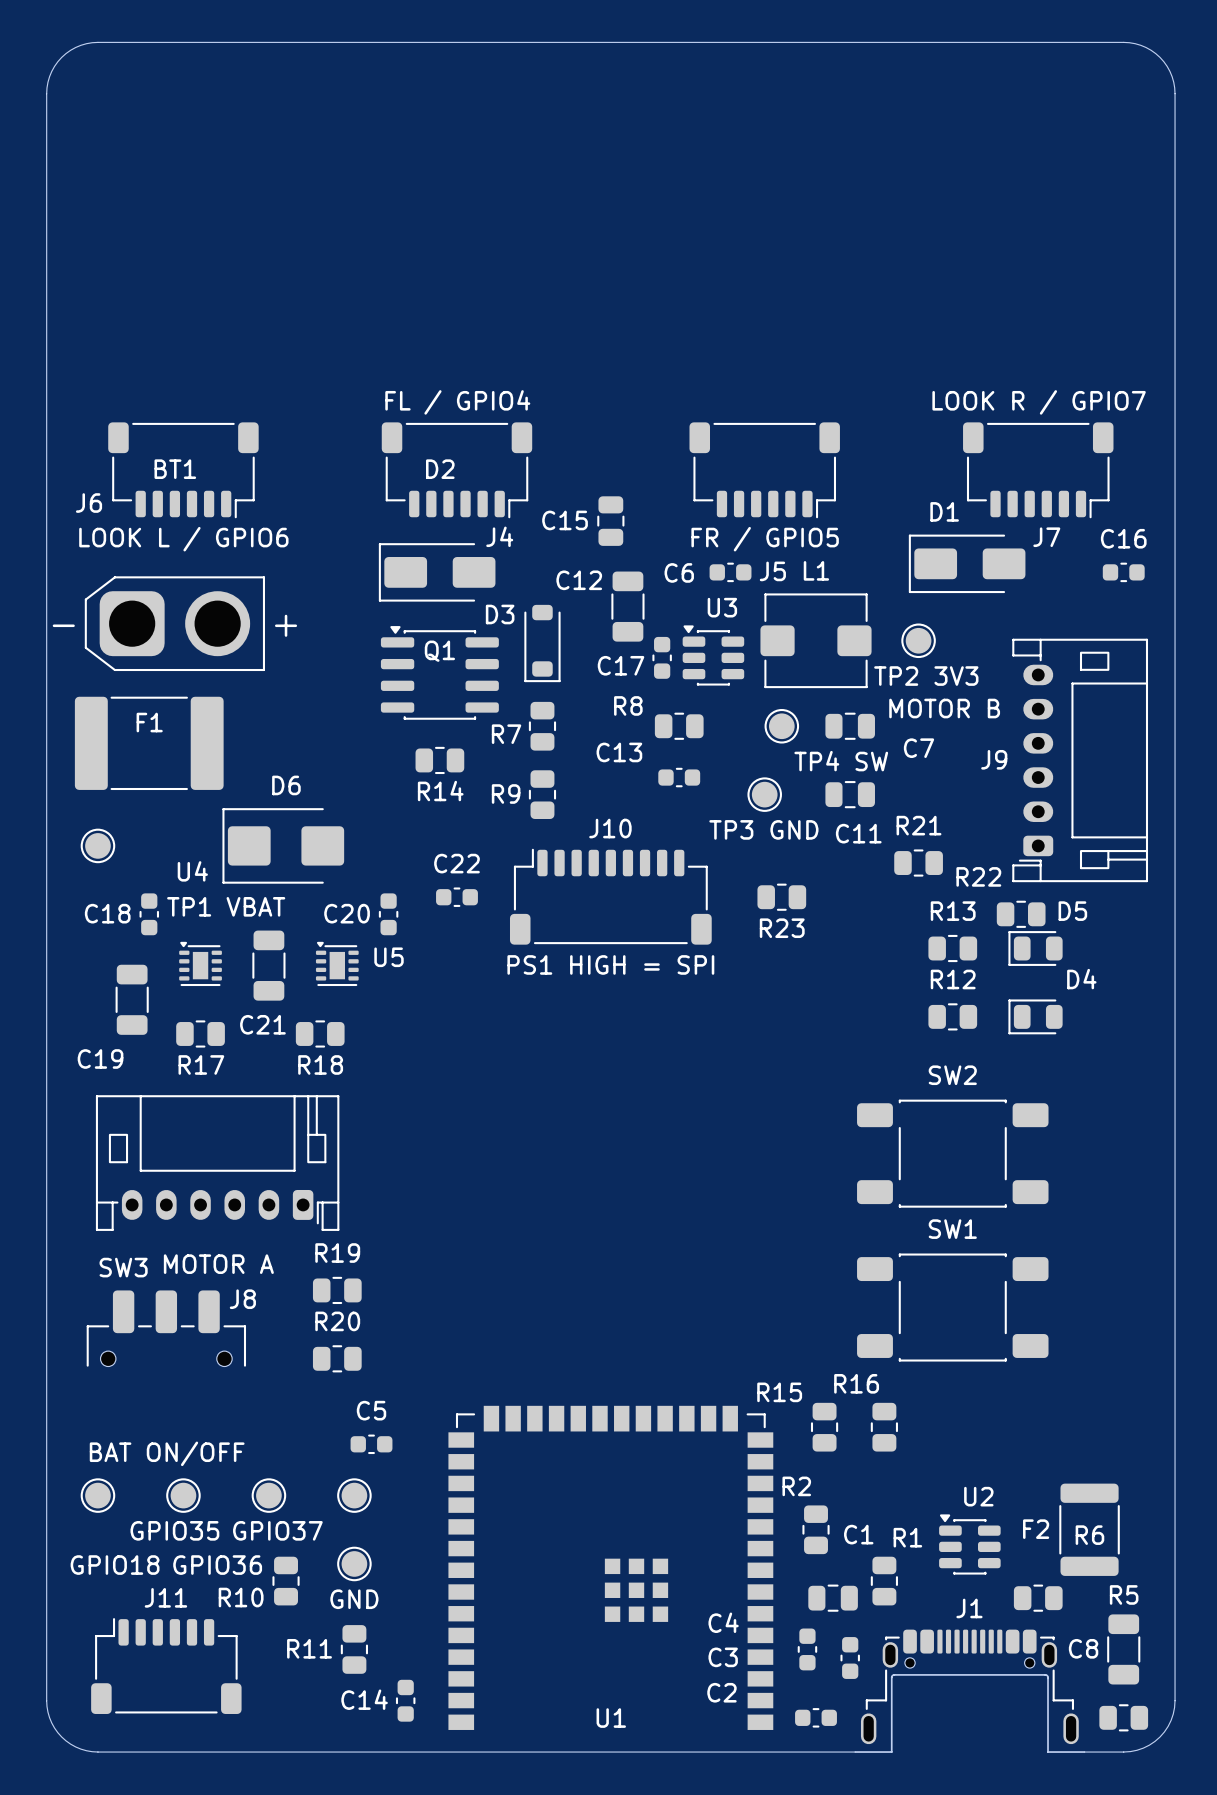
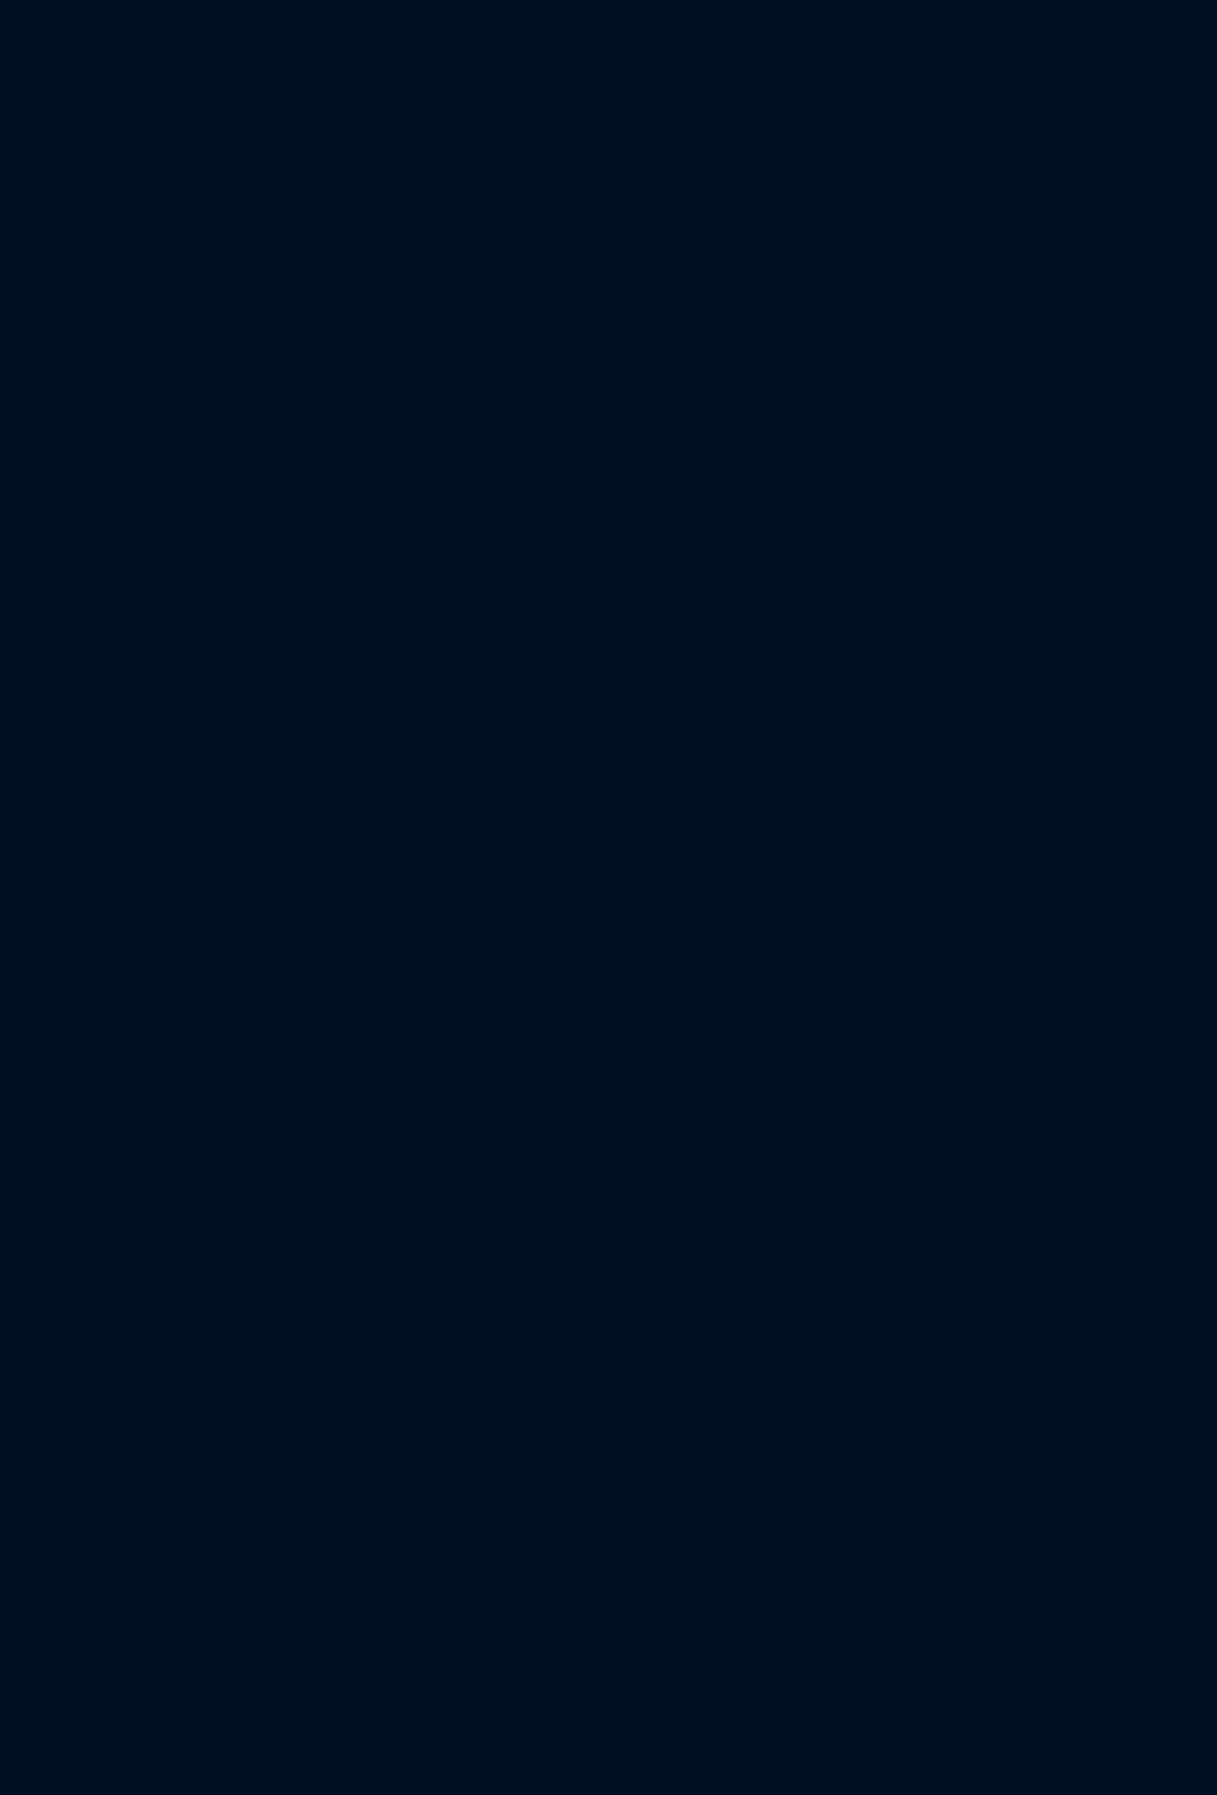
text: FL / GPIO4 (457, 402) -> none
text: LOOK R / GPIO7 (1039, 402) -> none
J6: (183, 470) -> none
J4: (456, 470) -> none
J5: (764, 470) -> none
J7: (1038, 470) -> none
C15: (610, 521) -> none
text: LOOK L / GPIO6 (183, 539) -> none
text: FR / GPIO5 (765, 539) -> none
D1: (967, 563) -> none
D2: (437, 572) -> none
C6: (730, 572) -> none
C16: (1123, 572) -> none
C12: (627, 606) -> none
BT1: (174, 623) -> none
L1: (816, 640) -> none
part: (918, 640) -> none
D3: (542, 643) -> none
U3: (713, 655) -> none
C17: (662, 657) -> none
Q1: (439, 672) -> none
text: TP2 3V3 (926, 676) -> none
text: MOTOR B (944, 708) -> none
R7: (542, 726) -> none
R8: (679, 726) -> none
part: (781, 726) -> none
C7: (850, 726) -> none
F1: (149, 743) -> none
R14: (439, 760) -> none
J9: (1080, 760) -> none
text: TP4 SW (841, 761) -> none
C13: (679, 777) -> none
R9: (542, 794) -> none
part: (764, 794) -> none
C11: (850, 794) -> none
text: TP3 GND (763, 829) -> none
part: (97, 845) -> none
D6: (283, 845) -> none
R21: (918, 863) -> none
J10: (610, 896) -> none
C22: (456, 897) -> none
R23: (781, 897) -> none
text: TP1 VBAT (226, 906) -> none
C18: (149, 914) -> none
C20: (388, 914) -> none
R22: (1021, 914) -> none
R13: (952, 948) -> none
D5: (1035, 948) -> none
U4: (200, 963) -> none
U5: (337, 963) -> none
text: PS1 HIGH = SPI (610, 964) -> none
C21: (268, 965) -> none
C19: (132, 999) -> none
R12: (952, 1016) -> none
D4: (1035, 1016) -> none
R17: (200, 1033) -> none
R18: (320, 1033) -> none
SW2: (952, 1153) -> none
J8: (217, 1163) -> none
text: MOTOR A (218, 1264) -> none
R19: (337, 1290) -> none
SW1: (952, 1307) -> none
SW3: (166, 1328) -> none
R20: (337, 1358) -> none
R15: (824, 1427) -> none
R16: (884, 1427) -> none
C5: (371, 1444) -> none
text: BAT ON/OFF (167, 1453) -> none
part: (97, 1495) -> none
part: (183, 1495) -> none
part: (268, 1495) -> none
part: (354, 1495) -> none
R2: (816, 1529) -> none
F2: (1089, 1529) -> none
text: GPIO35 (174, 1530) -> none
text: GPIO37 (277, 1530) -> none
U2: (969, 1544) -> none
part: (354, 1563) -> none
text: GPIO18 (115, 1565) -> none
text: GPIO36 (217, 1565) -> none
U1: (610, 1567) -> none
R10: (286, 1581) -> none
R1: (884, 1581) -> none
C1: (833, 1598) -> none
R6: (1038, 1598) -> none
text: GND (354, 1599) -> none
R11: (354, 1649) -> none
C4: (807, 1649) -> none
C8: (1123, 1649) -> none
C3: (850, 1658) -> none
J11: (166, 1666) -> none
J1: (969, 1691) -> none
C14: (405, 1700) -> none
C2: (816, 1717) -> none
R5: (1123, 1717) -> none
board edge: (855, 1752) (97, 1752) (86, 1750) (70, 1744) (57, 1732) (51, 1722) (46, 1700) (46, 93) (47, 82) (54, 66) (65, 53) (75, 47) (97, 42) (1123, 42) (1140, 45) (1151, 50) (1167, 66) (1172, 76) (1175, 93) (1175, 1700) (1173, 1714) (1168, 1726) (1160, 1737) (1149, 1745) (1130, 1751) (1084, 1752) -> none

